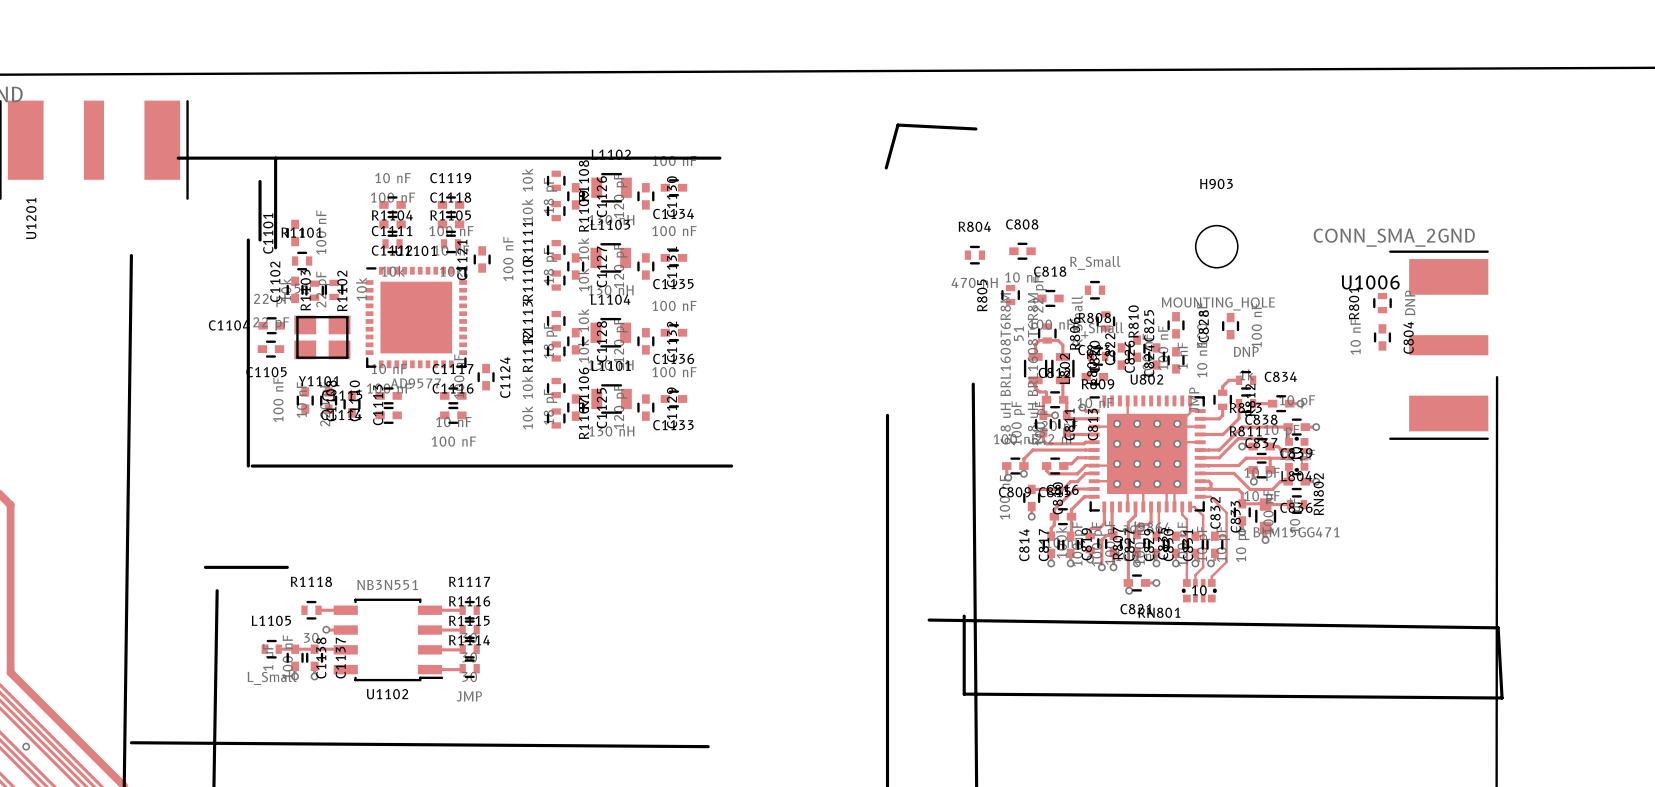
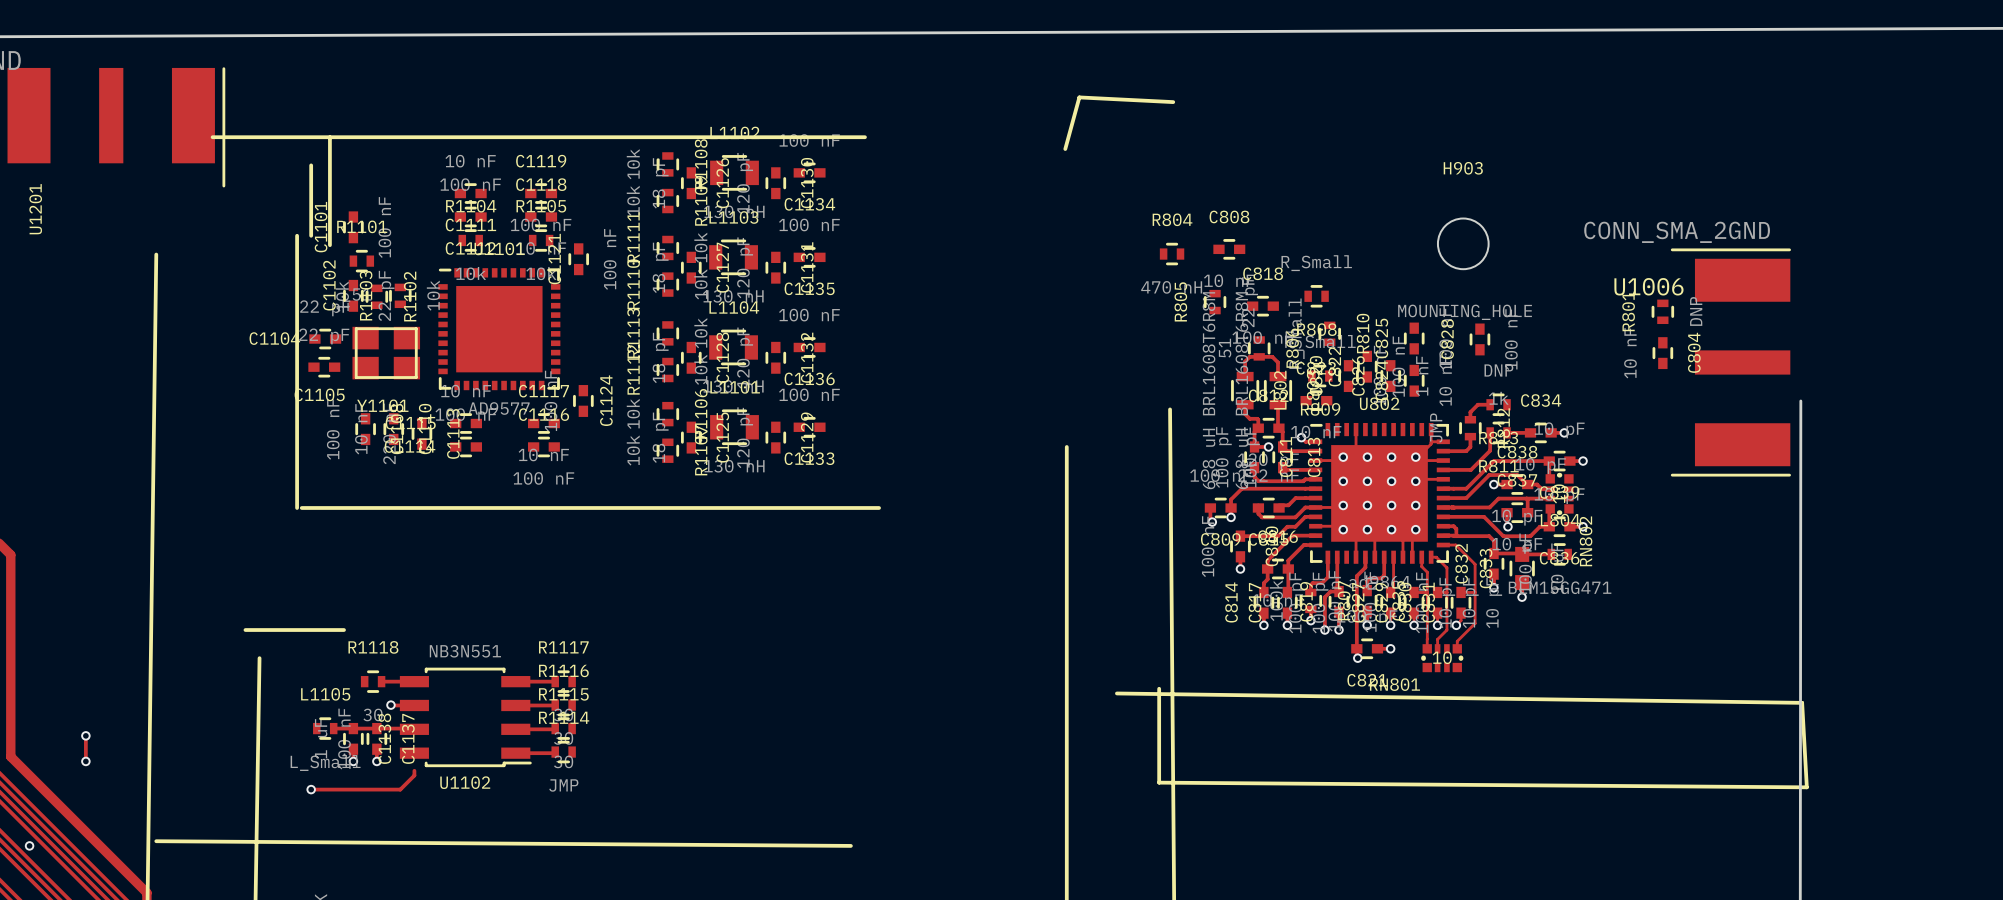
track: none -> (85, 735) (85, 761)
via: none -> (85, 735)
via: none -> (85, 761)
track: none -> (414, 770) (414, 775) (400, 789) (311, 789)
via: none -> (311, 789)

